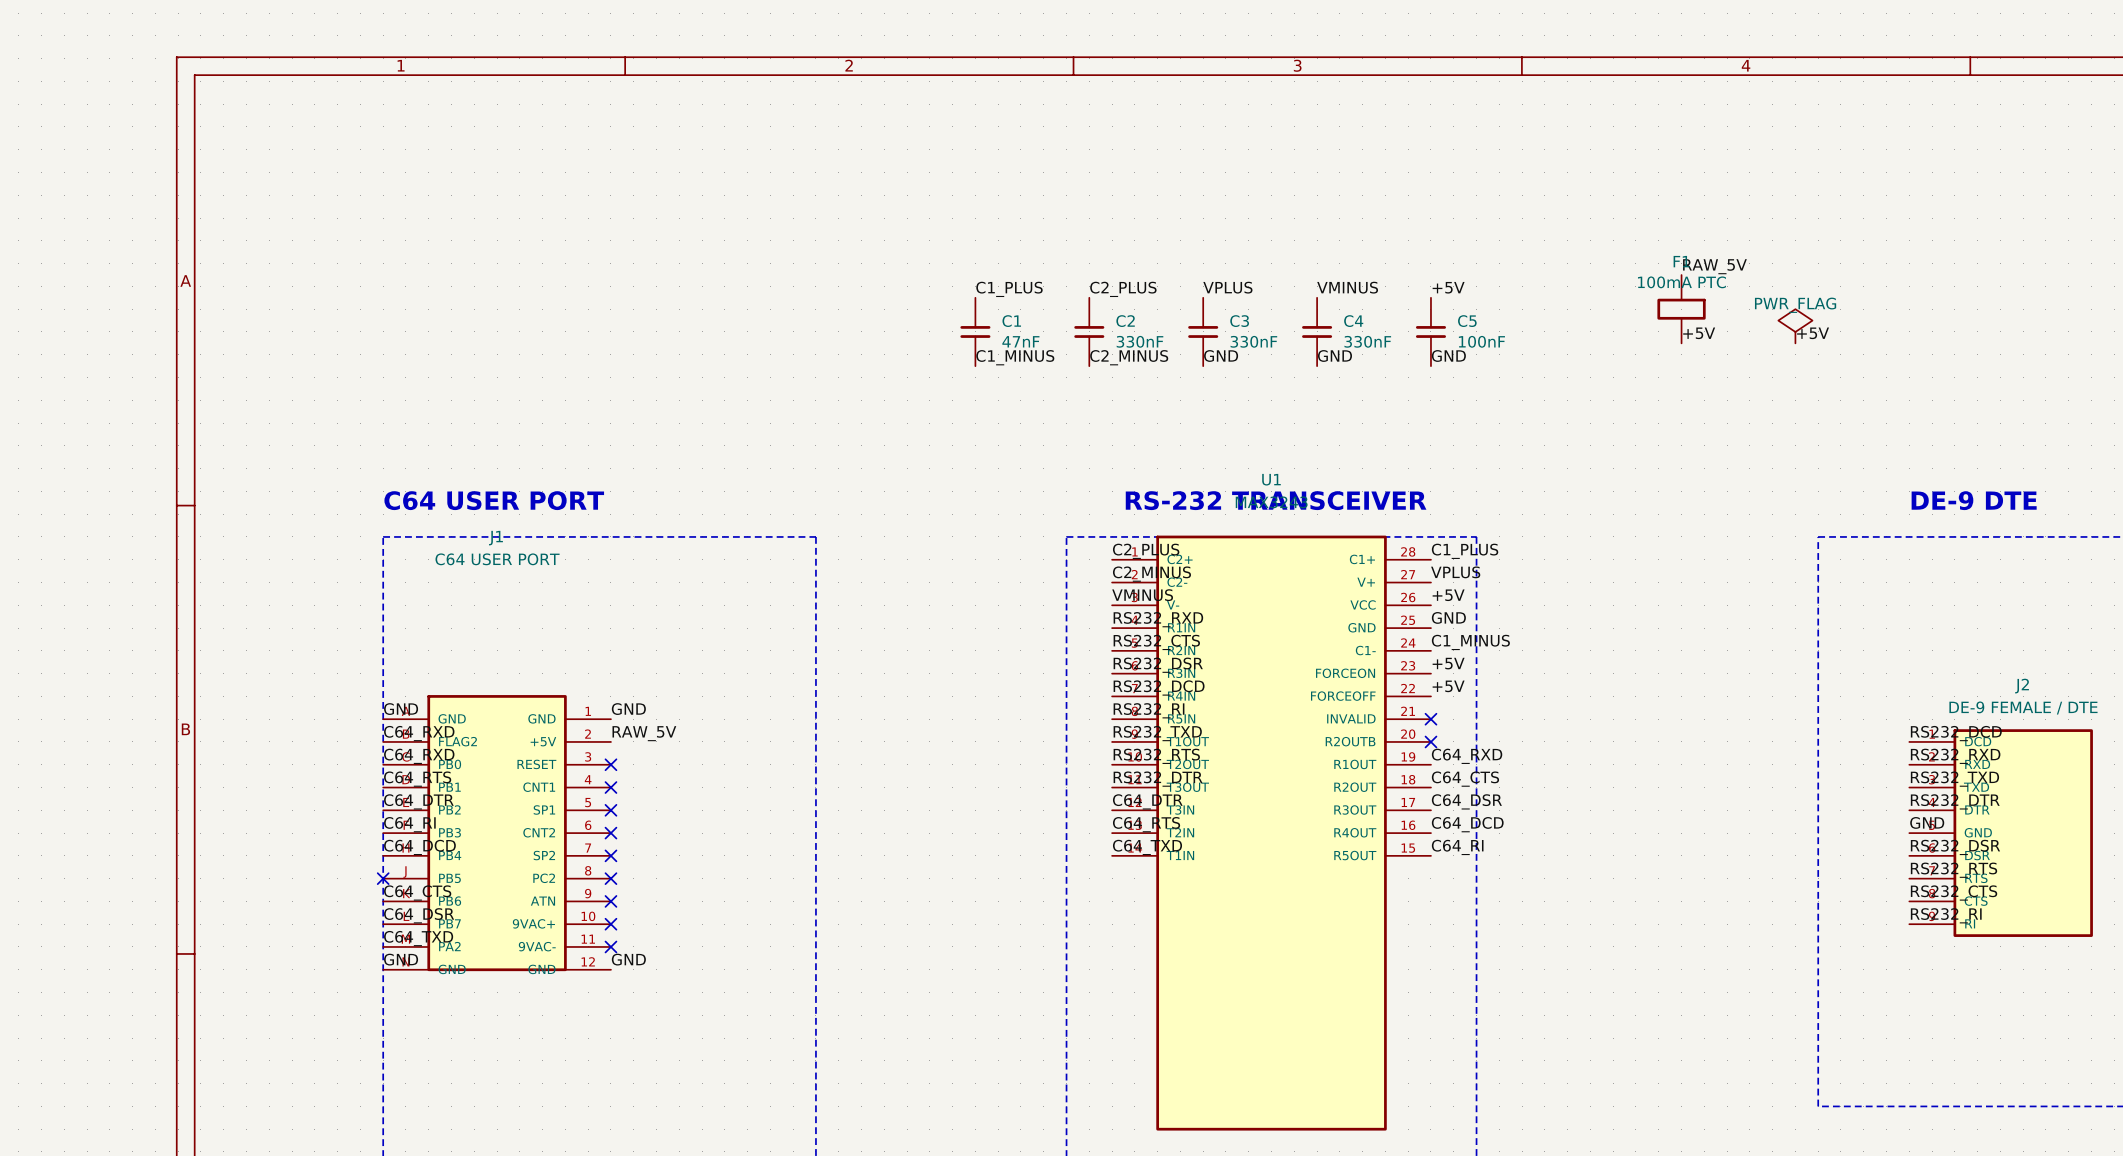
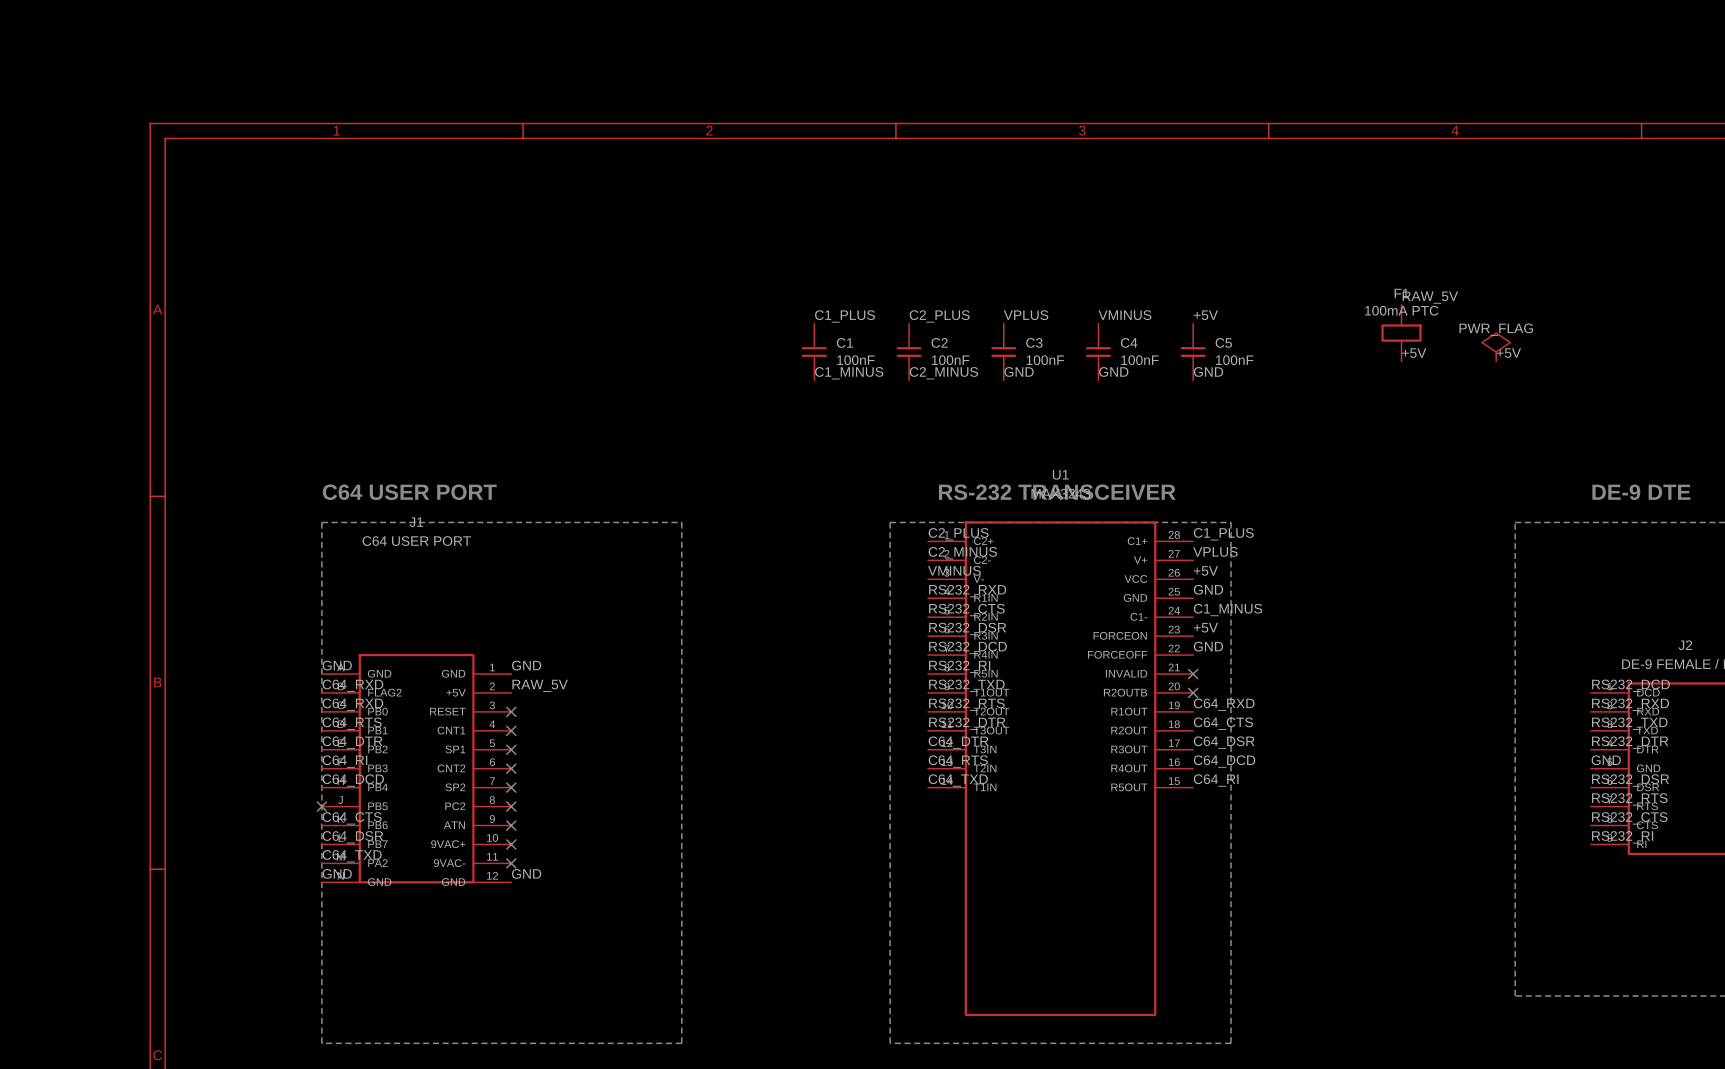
C1 value: 47nF (1020, 341) -> 100nF (855, 360)
C2 value: 330nF (1139, 341) -> 100nF (950, 360)
C3 value: 330nF (1253, 341) -> 100nF (1045, 360)
C4 value: 330nF (1367, 341) -> 100nF (1140, 360)
label: +5V (1448, 686) -> GND (1208, 646)

